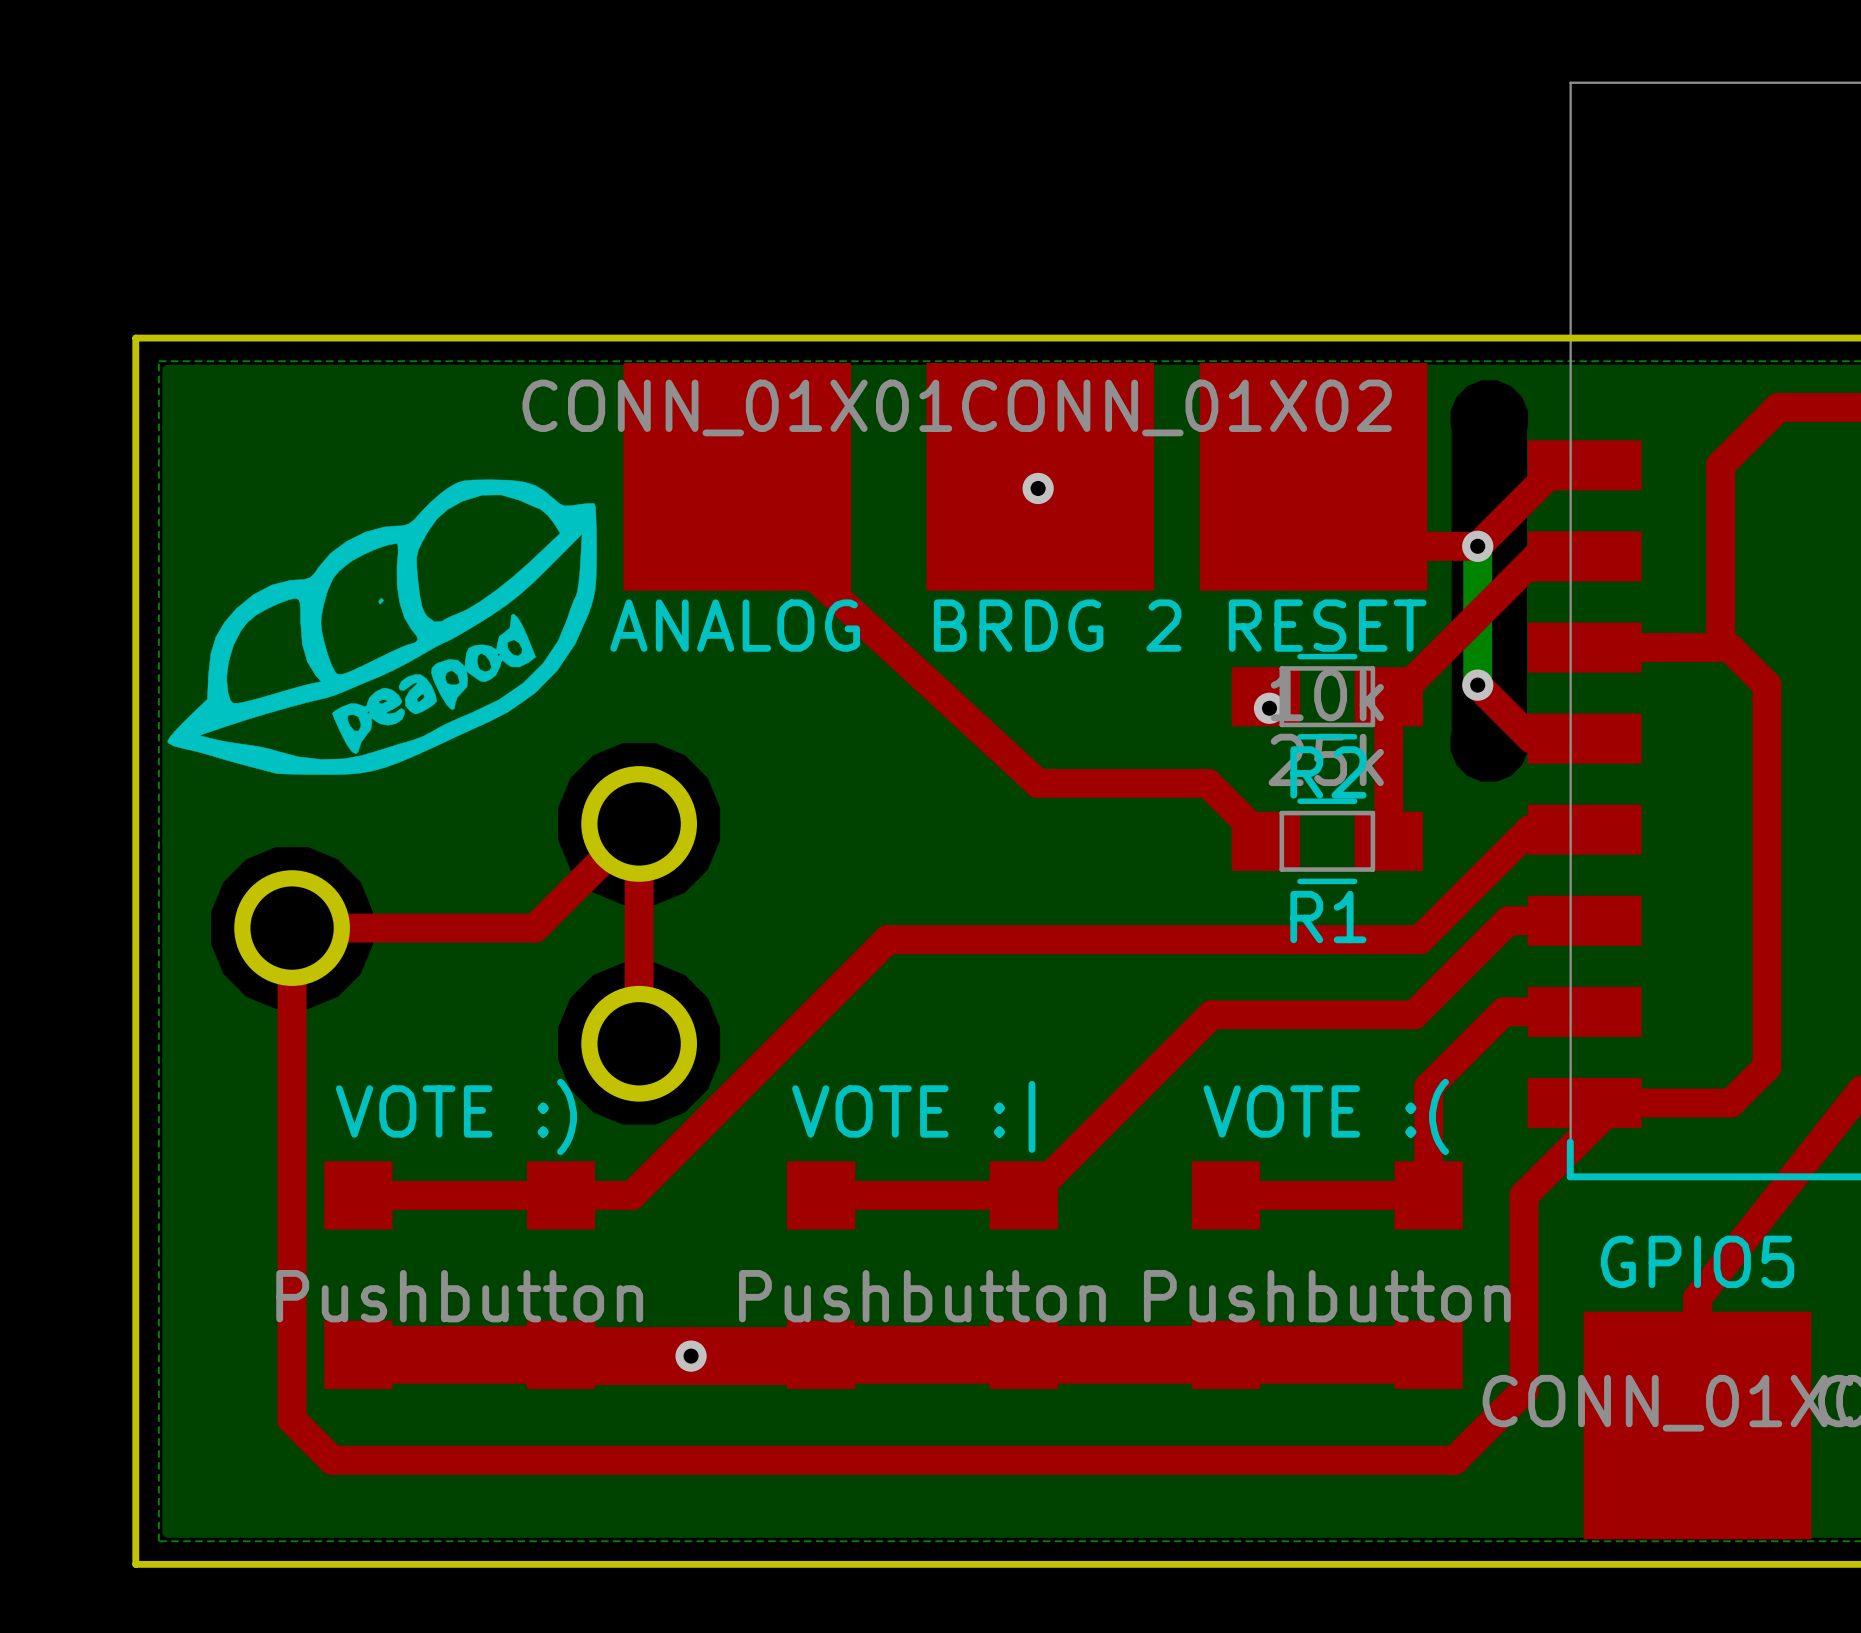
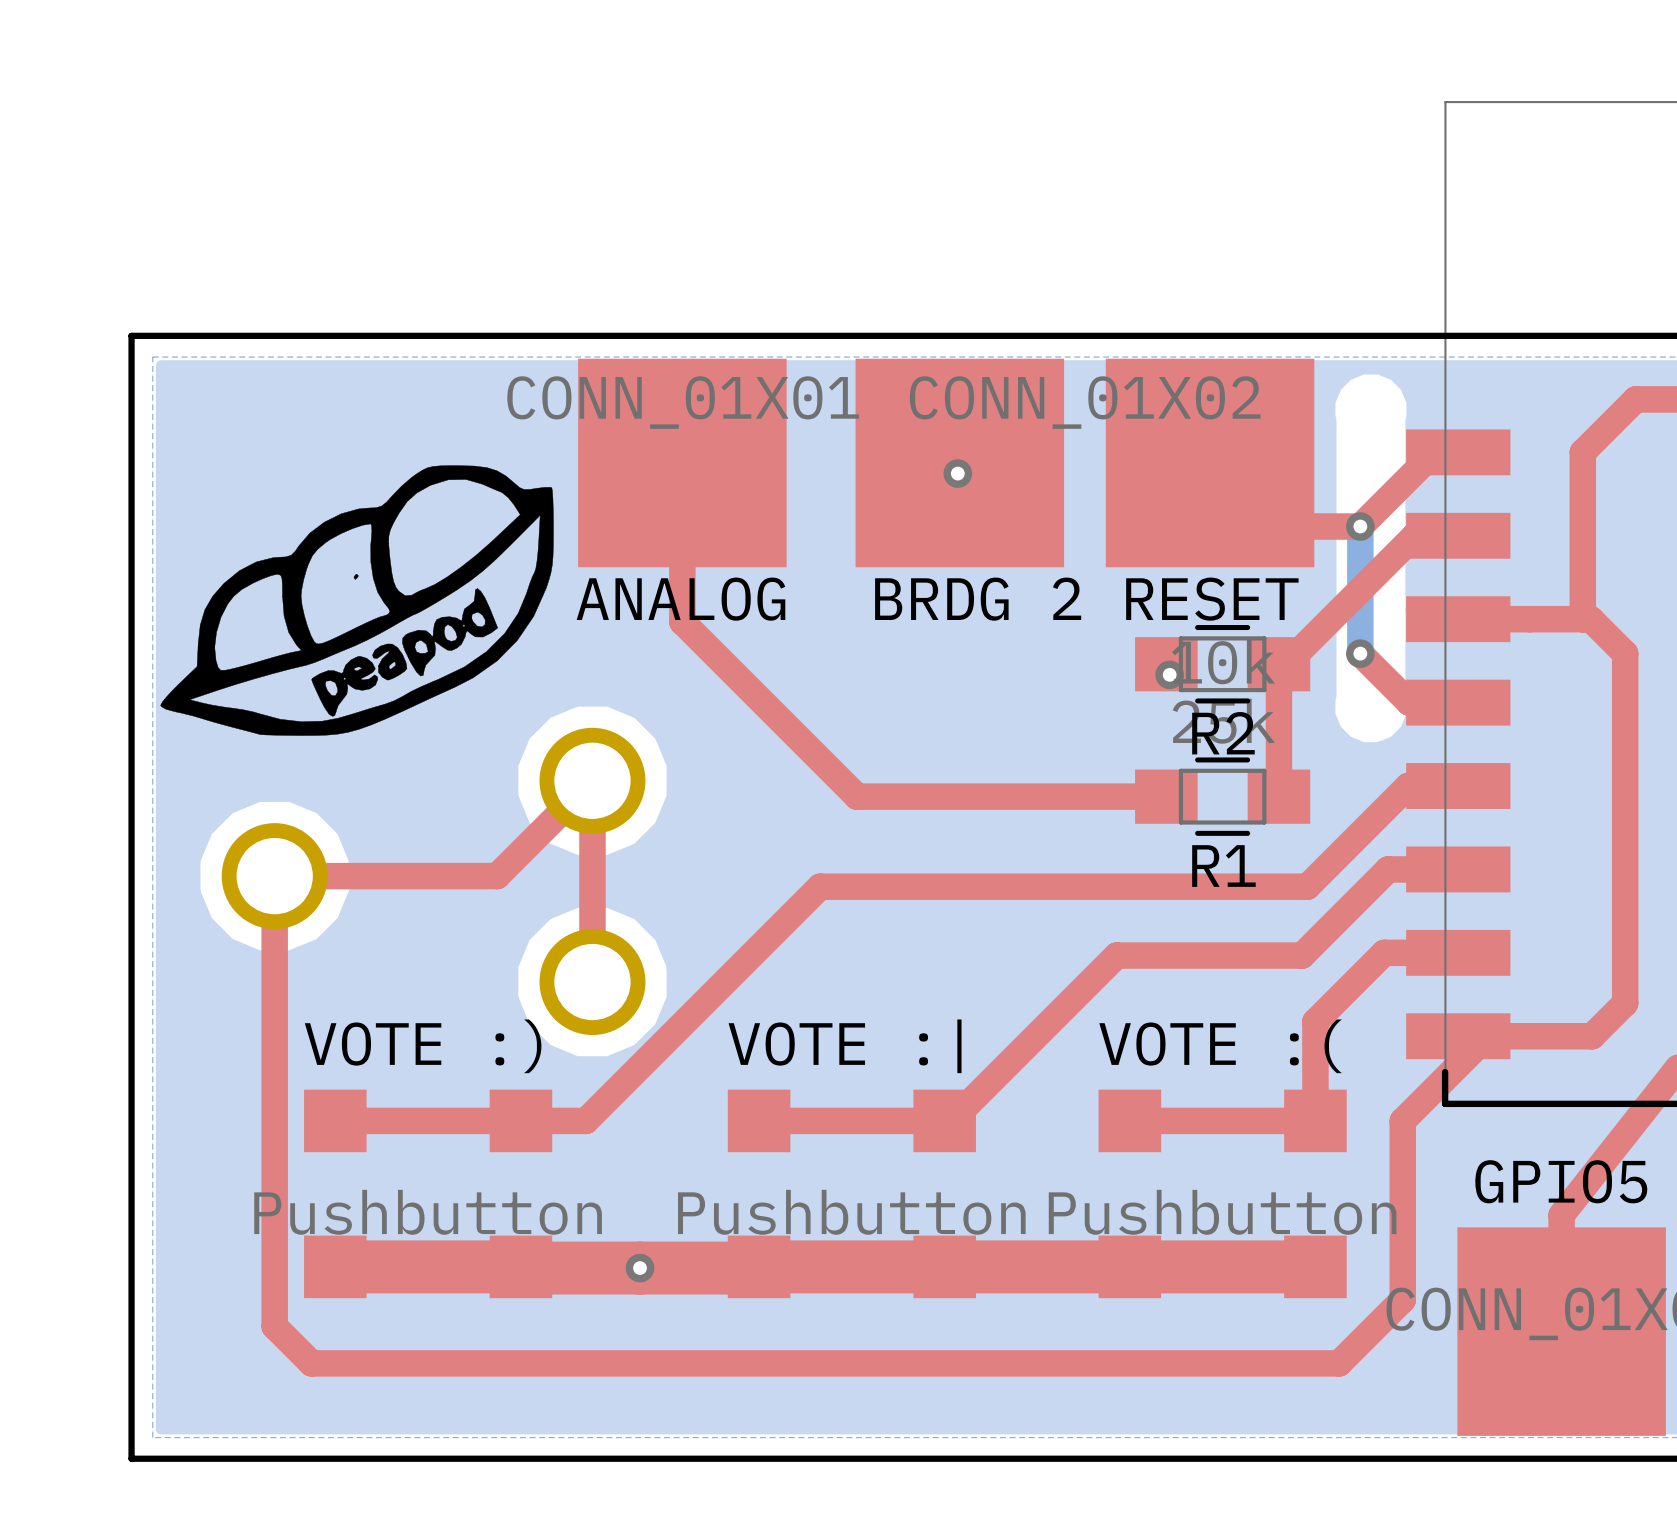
top track: (737, 505) (1038, 783) (1208, 783) (1265, 841) -> (682, 489) (682, 621) (857, 796) (1166, 796)

